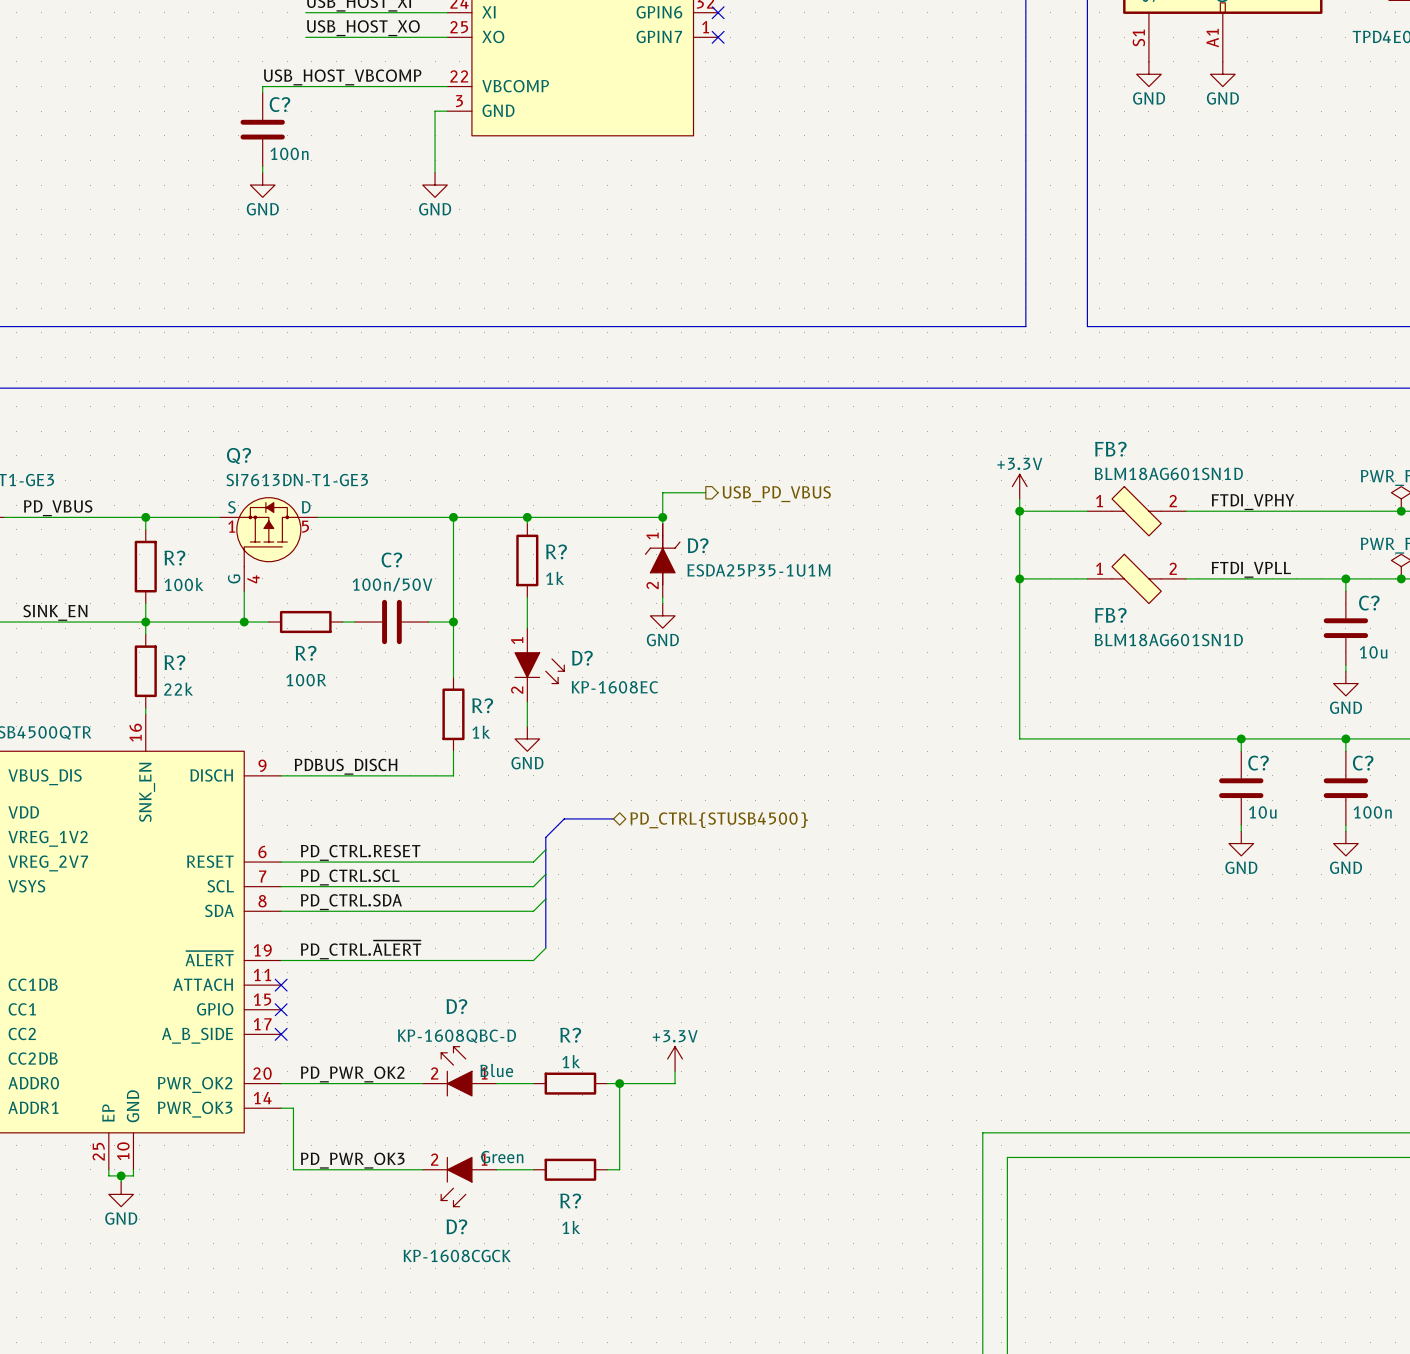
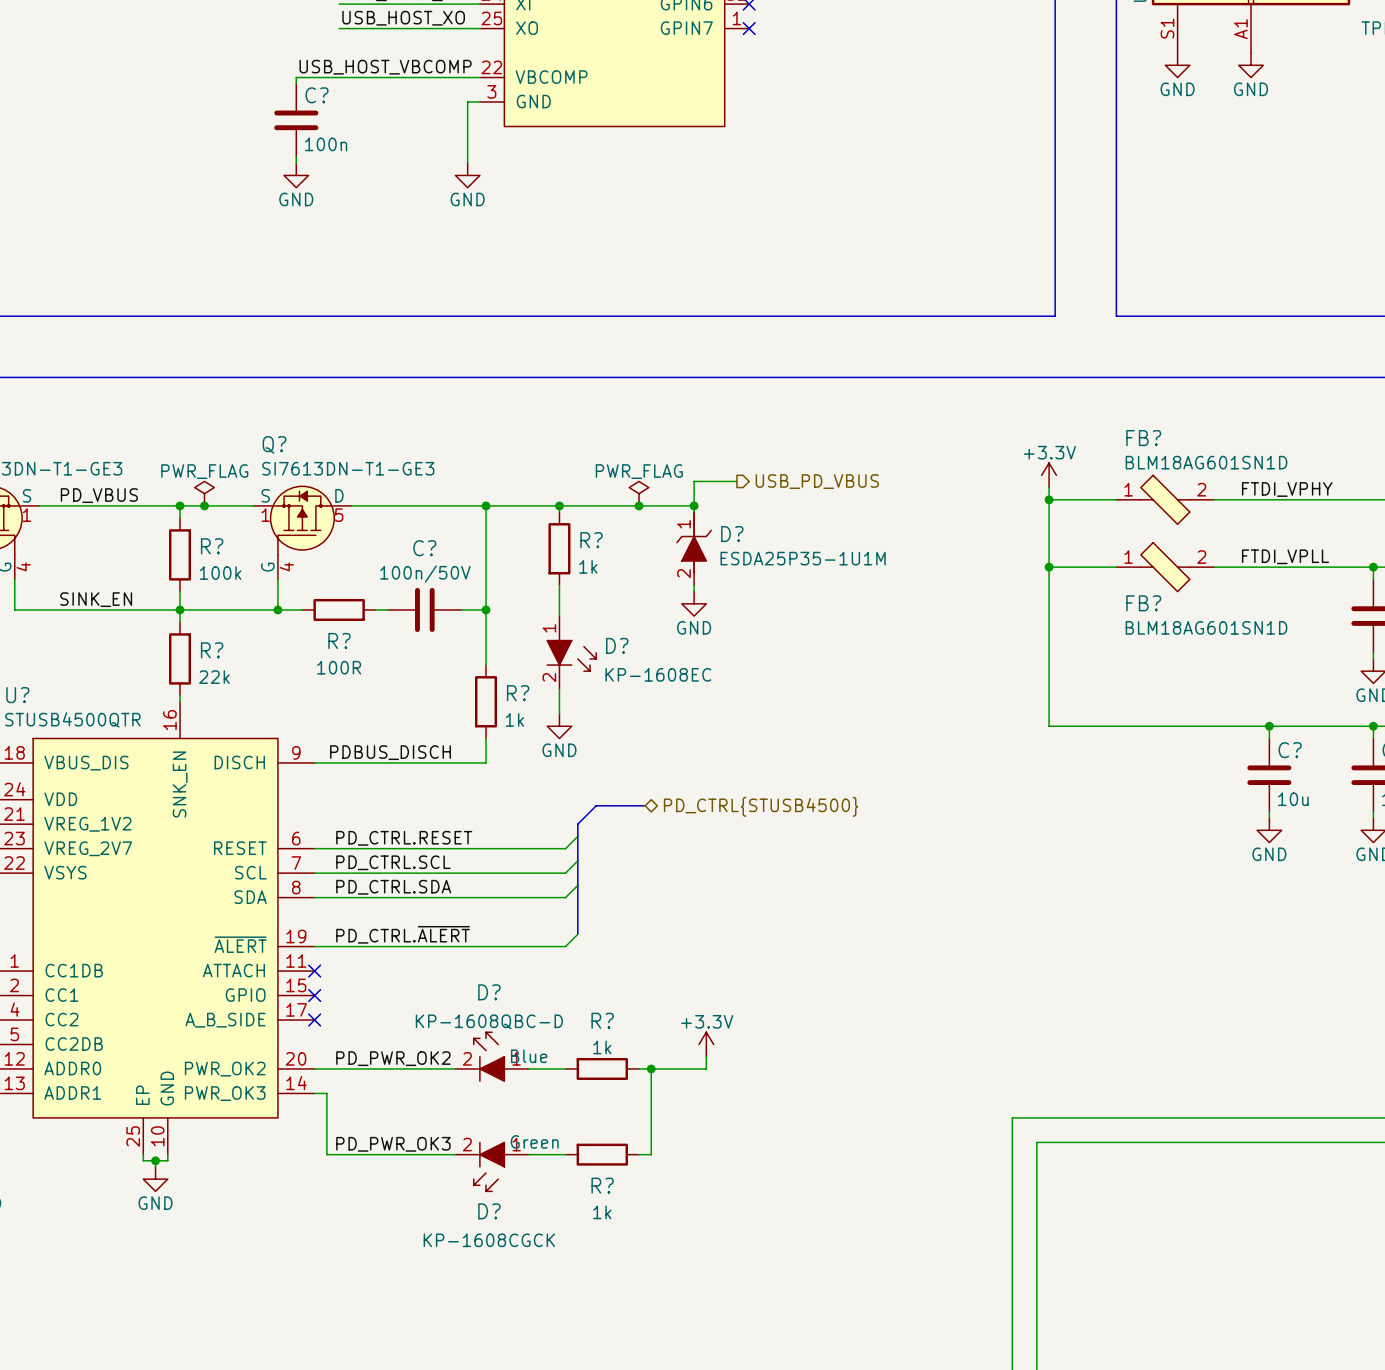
power symbol: none -> PWR_FLAG (204, 493)
power symbol: none -> PWR_FLAG (639, 493)
junction: none -> (204, 505)
junction: none -> (639, 505)

